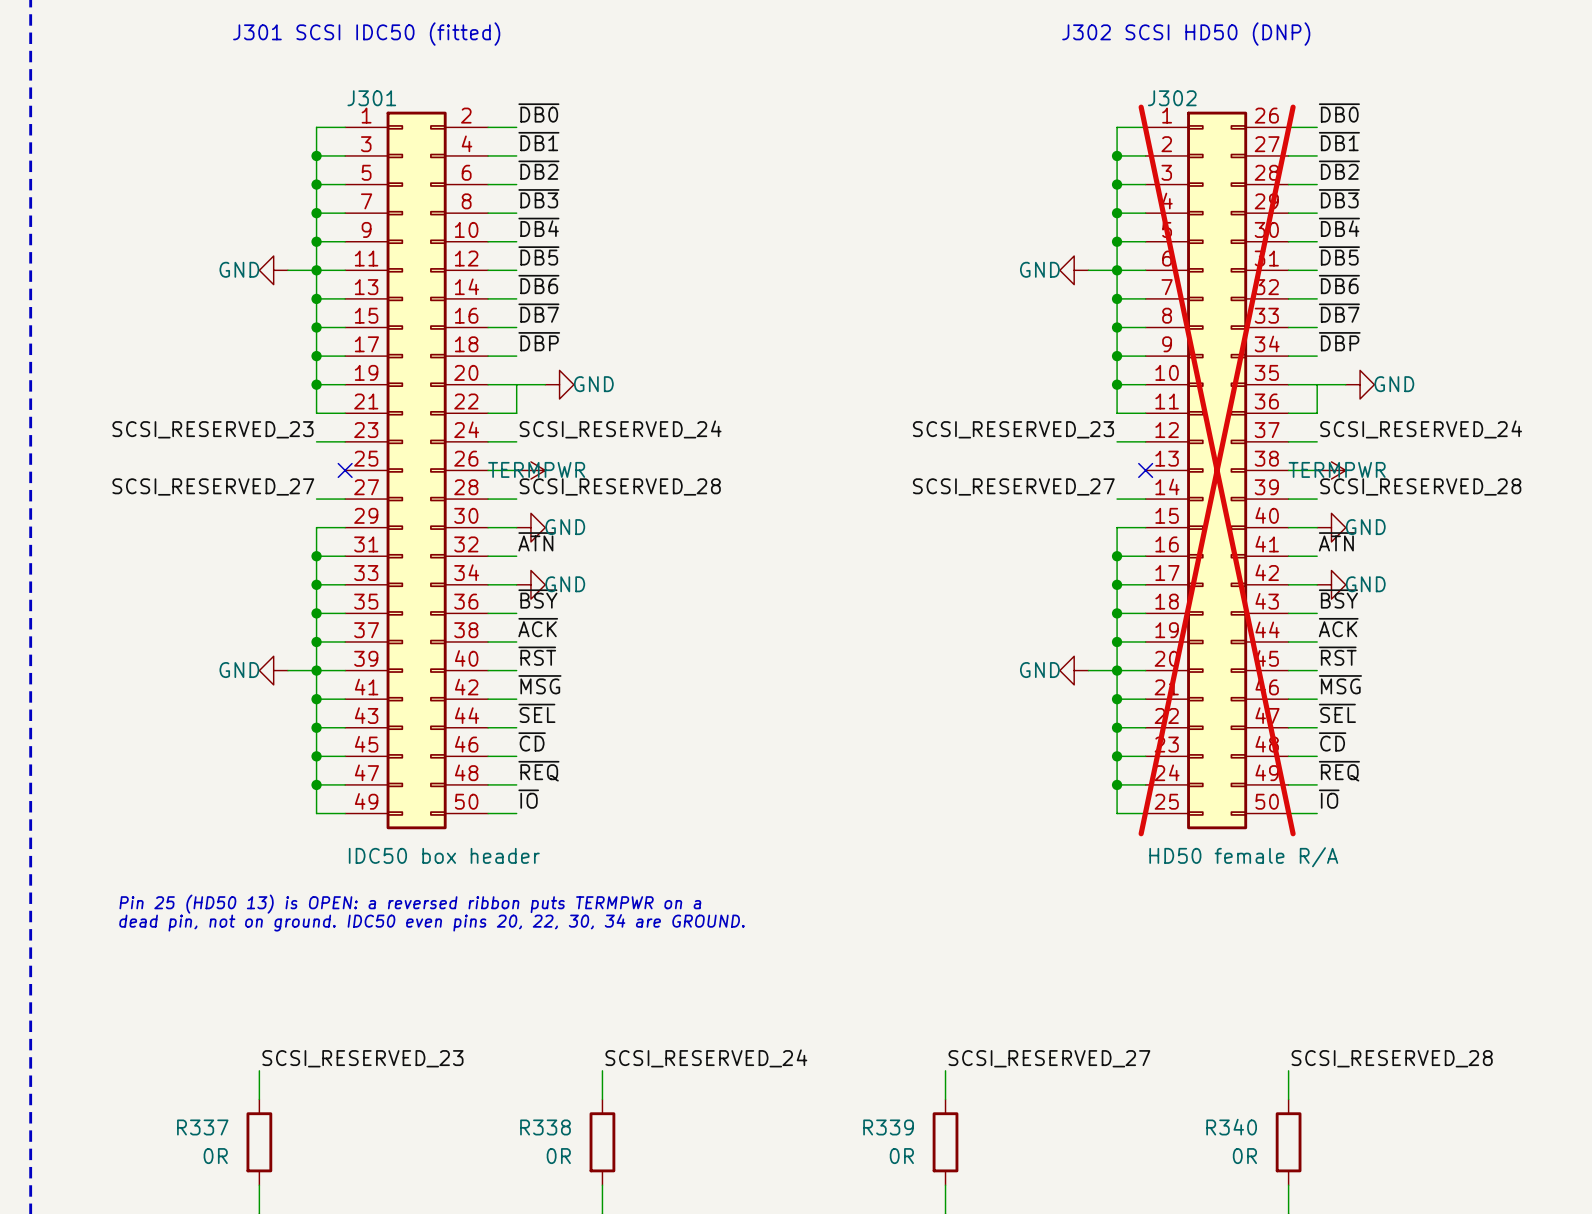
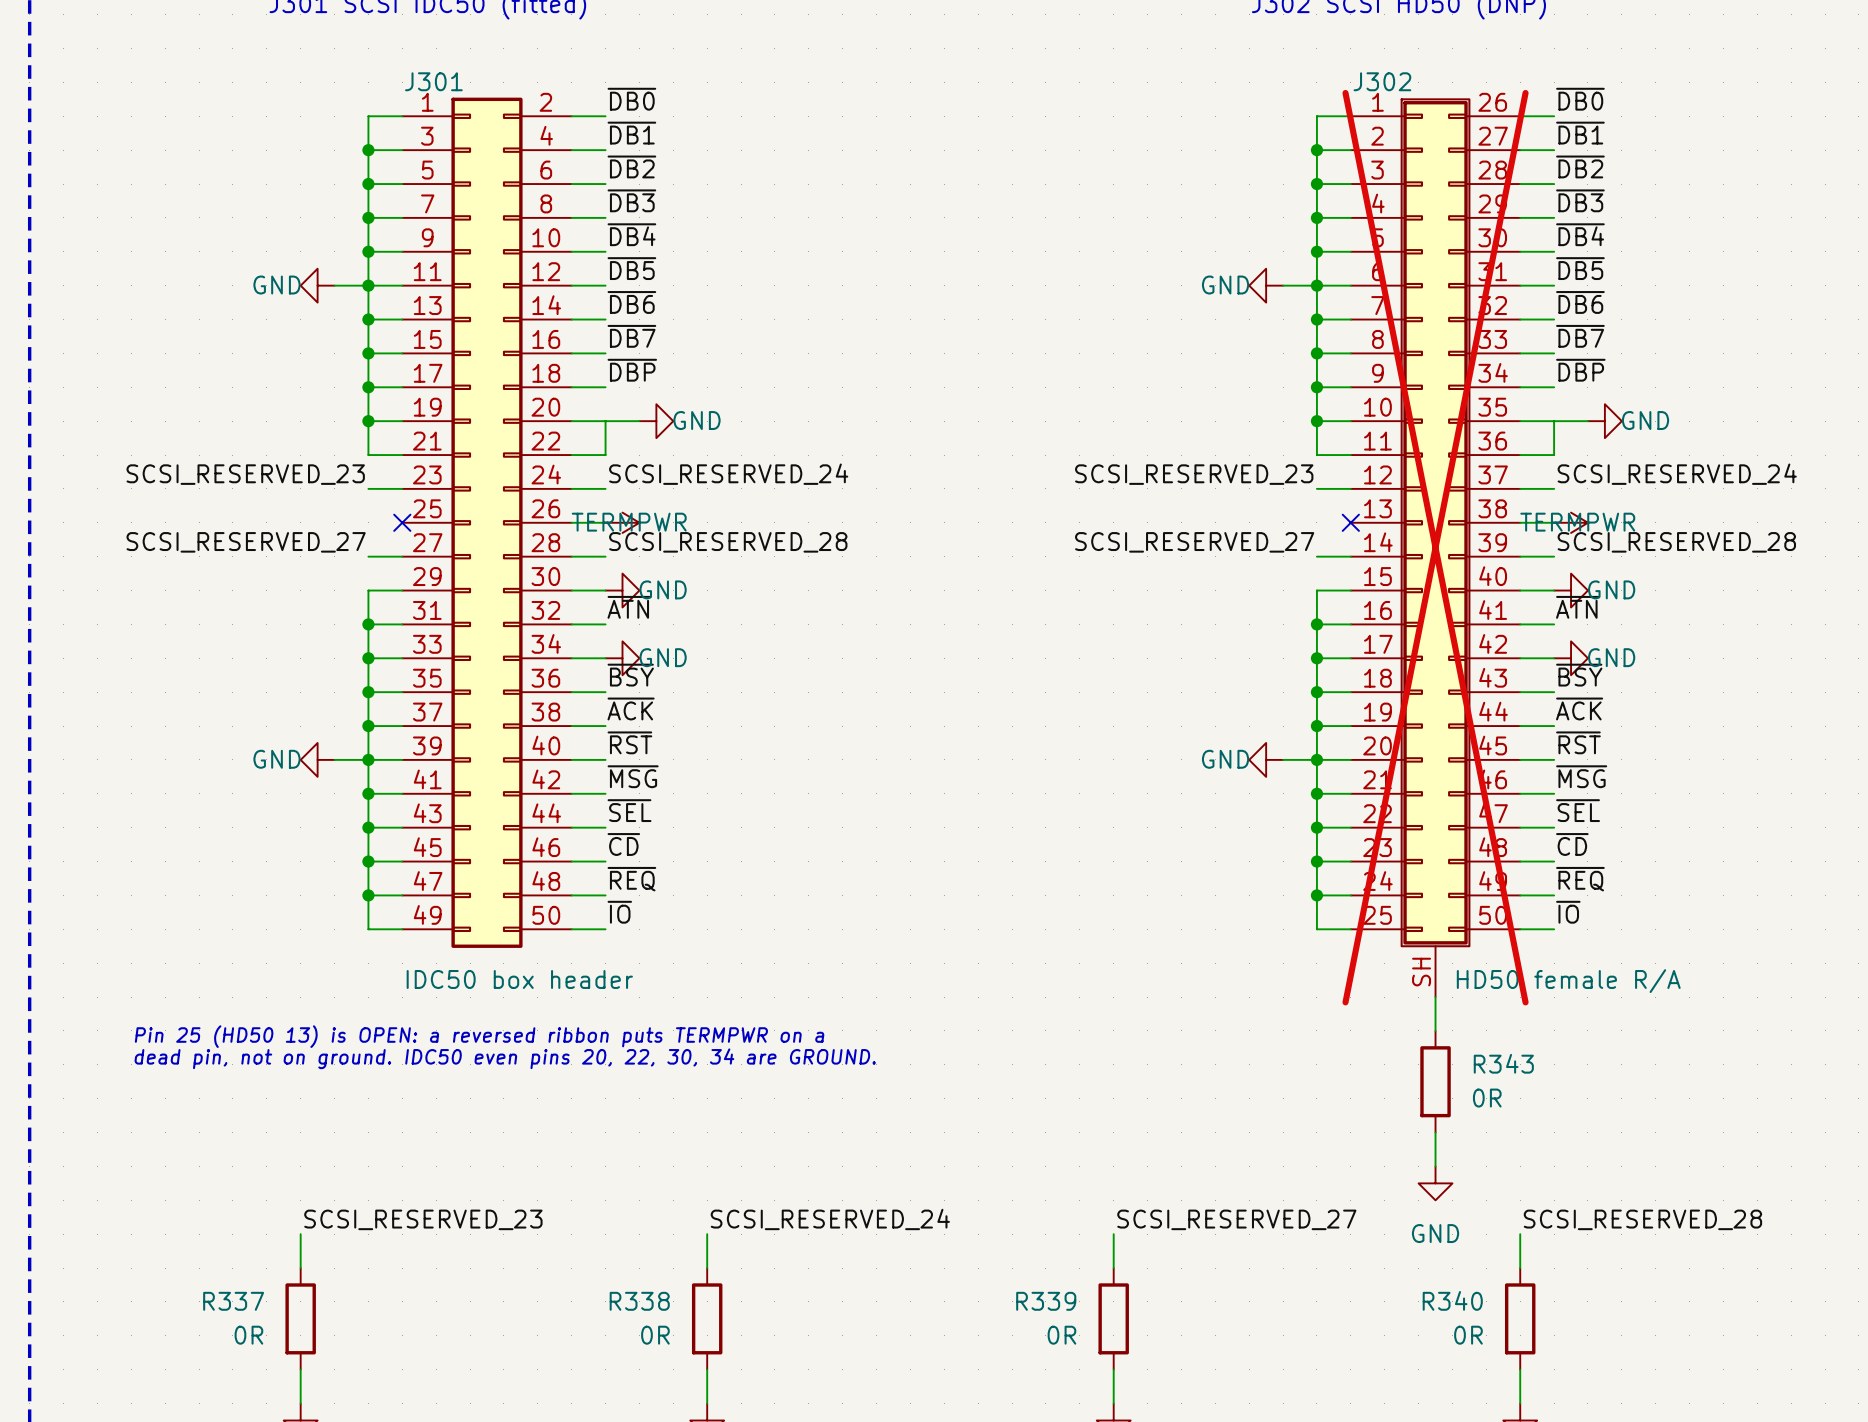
J302 symbol: [1145, 111, 1289, 830] -> [1350, 98, 1521, 998]
J302 value position: HD50 female R/A (1243, 857) -> HD50 female R/A (1568, 981)
wire: none -> (1435, 997) (1435, 1030)
R343: none -> 0R (1435, 1081)
wire: none -> (1435, 1132) (1435, 1166)
power symbol: none -> GND (1435, 1183)

